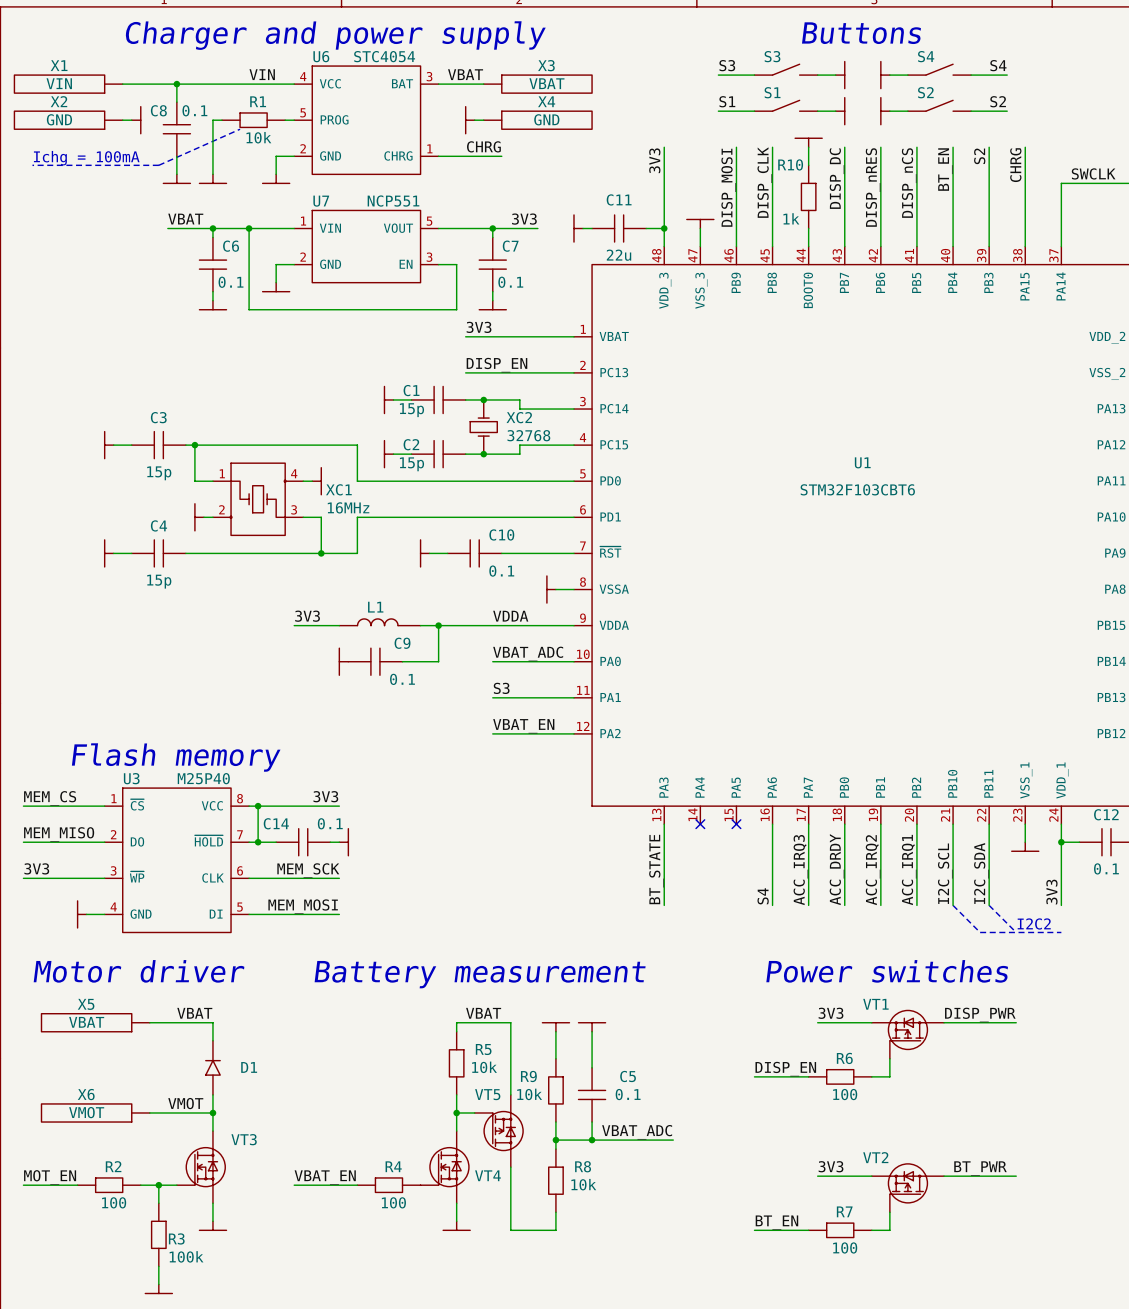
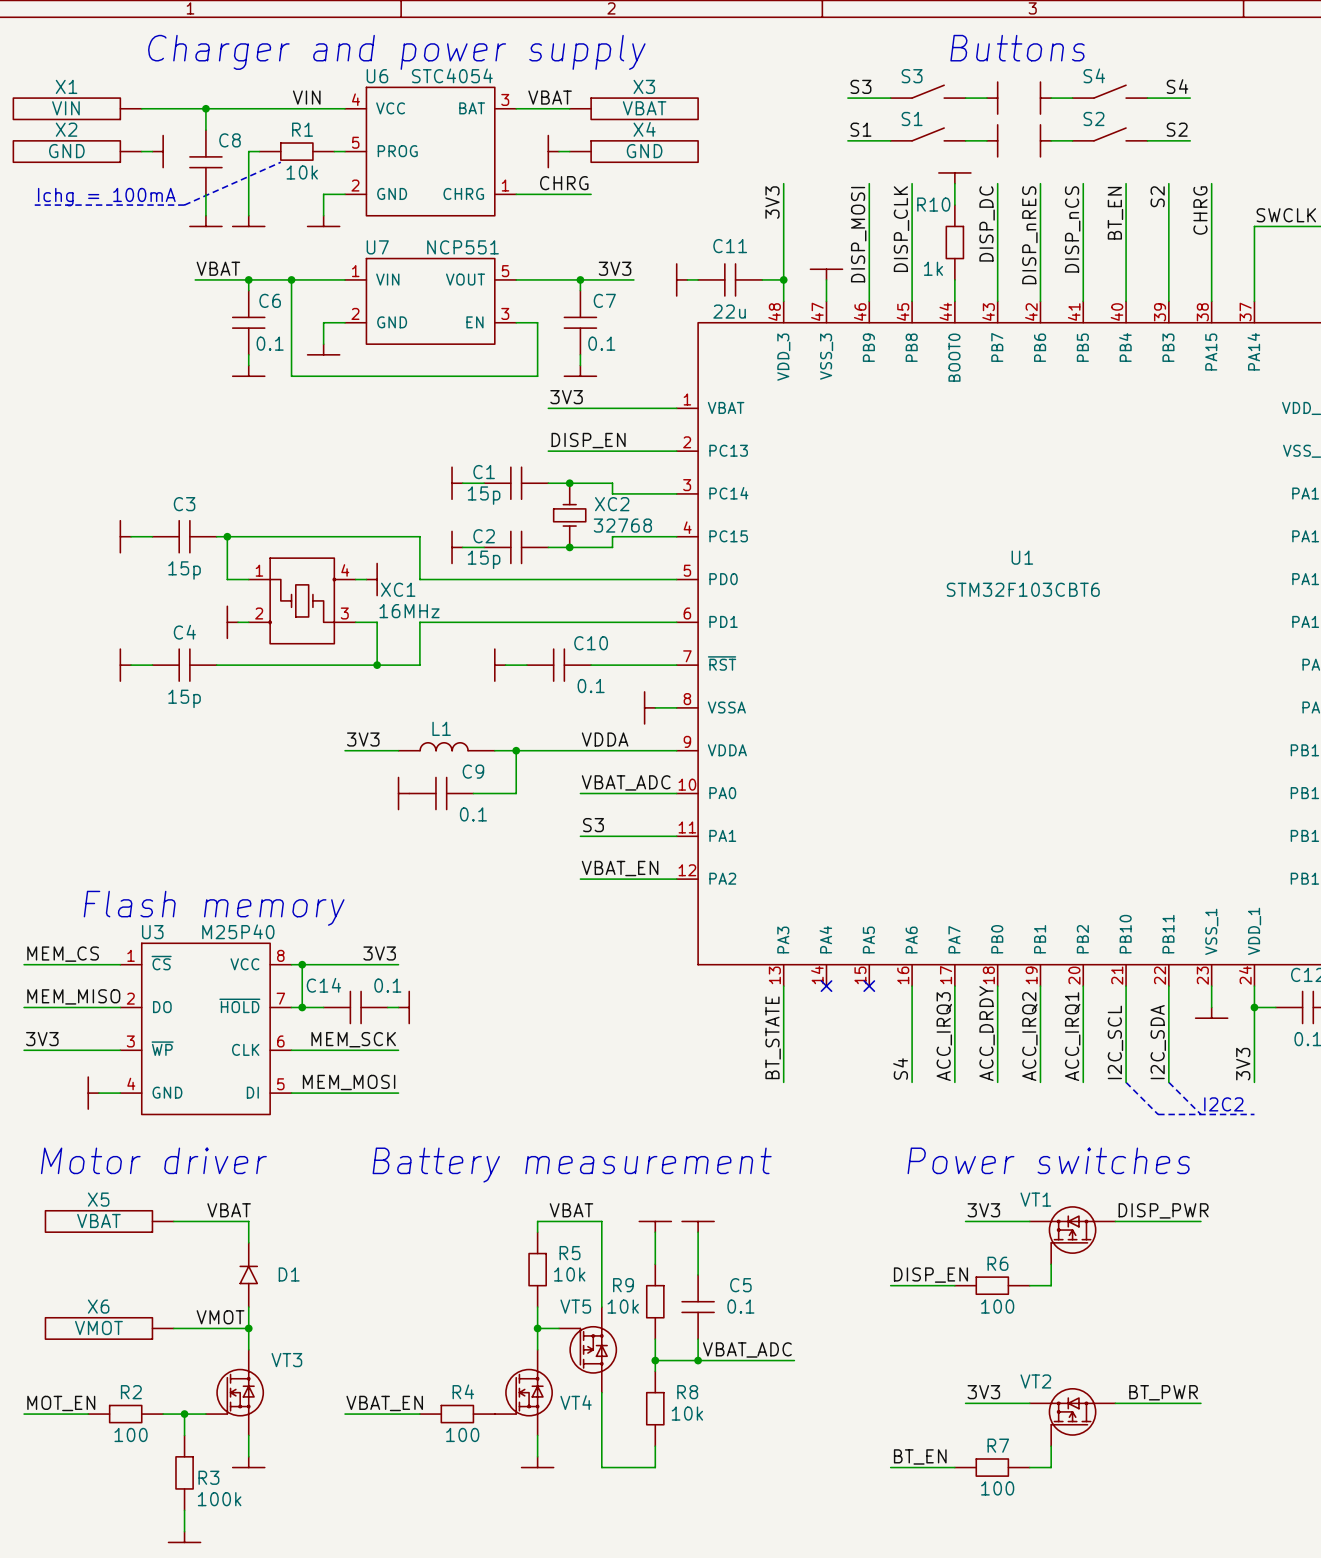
C8 name position: C8 (158, 110) -> C8 (230, 140)
C8 value: 0.1 (194, 110) -> none

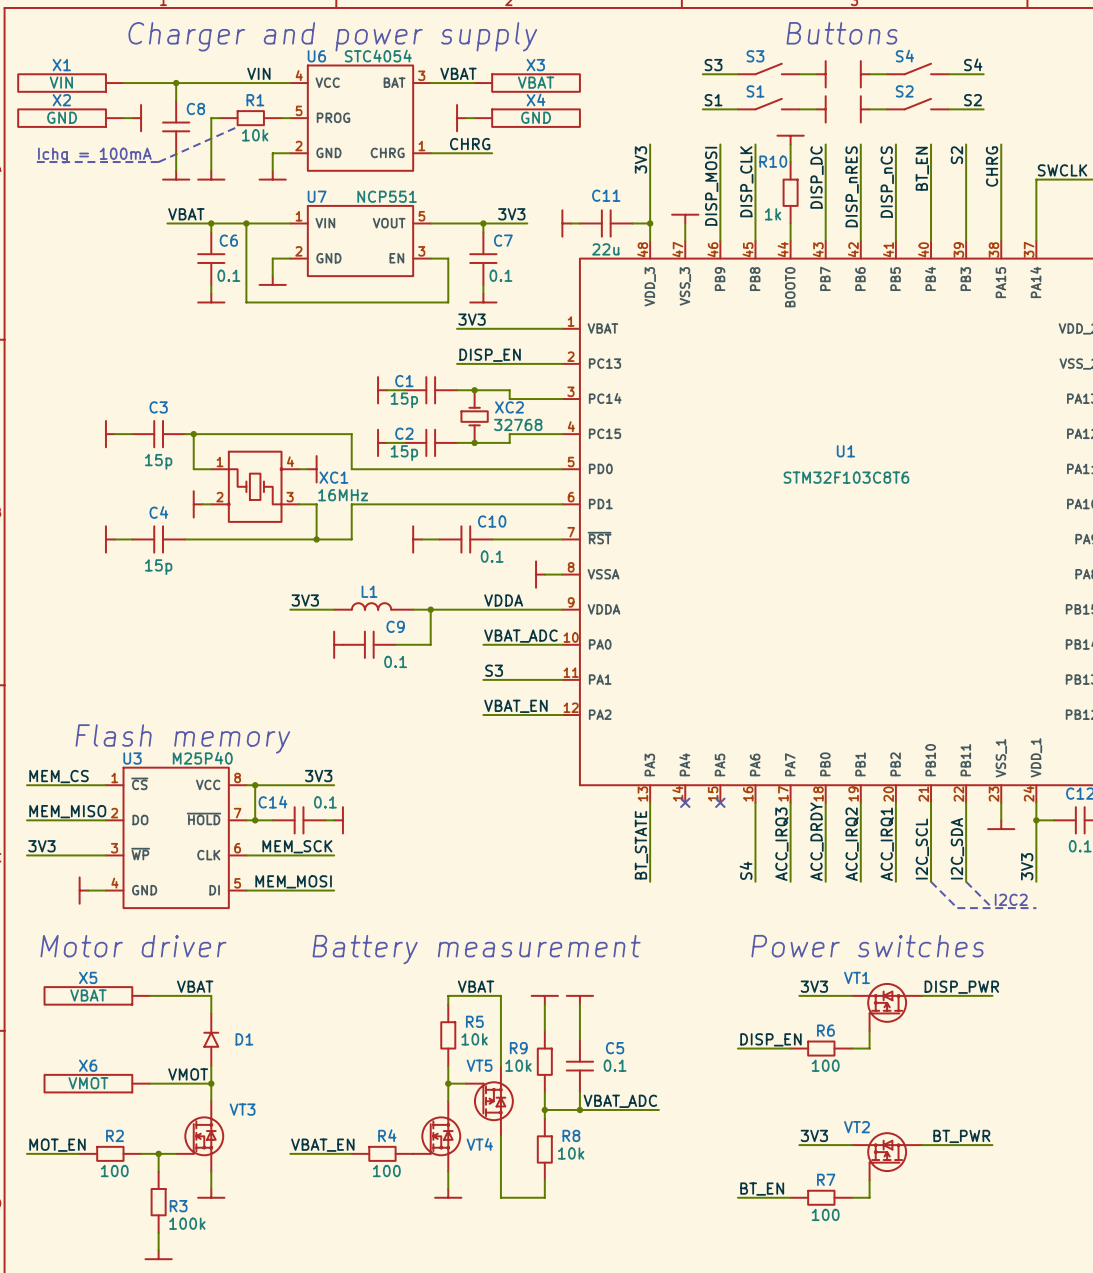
U1 value: STM32F103CBT6 (1023, 589) -> STM32F103C8T6 (846, 477)

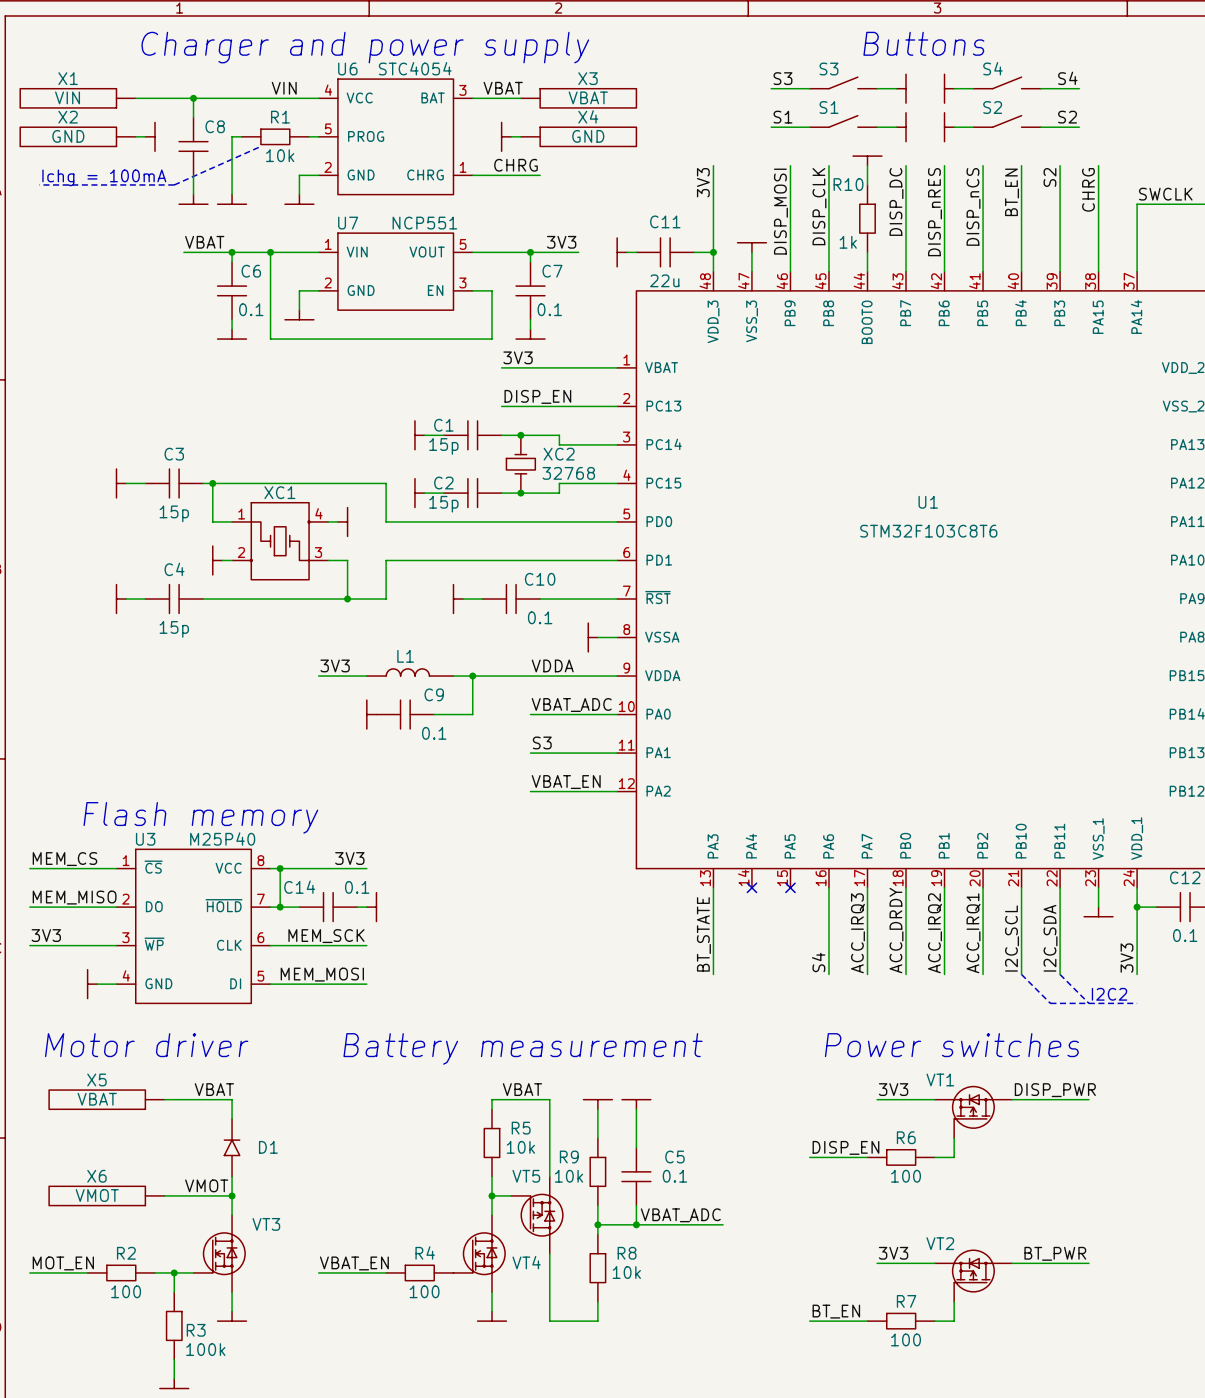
XC1 name position: XC1 (333, 477) -> XC1 (279, 492)
XC1 value: 16MHz (343, 495) -> none

